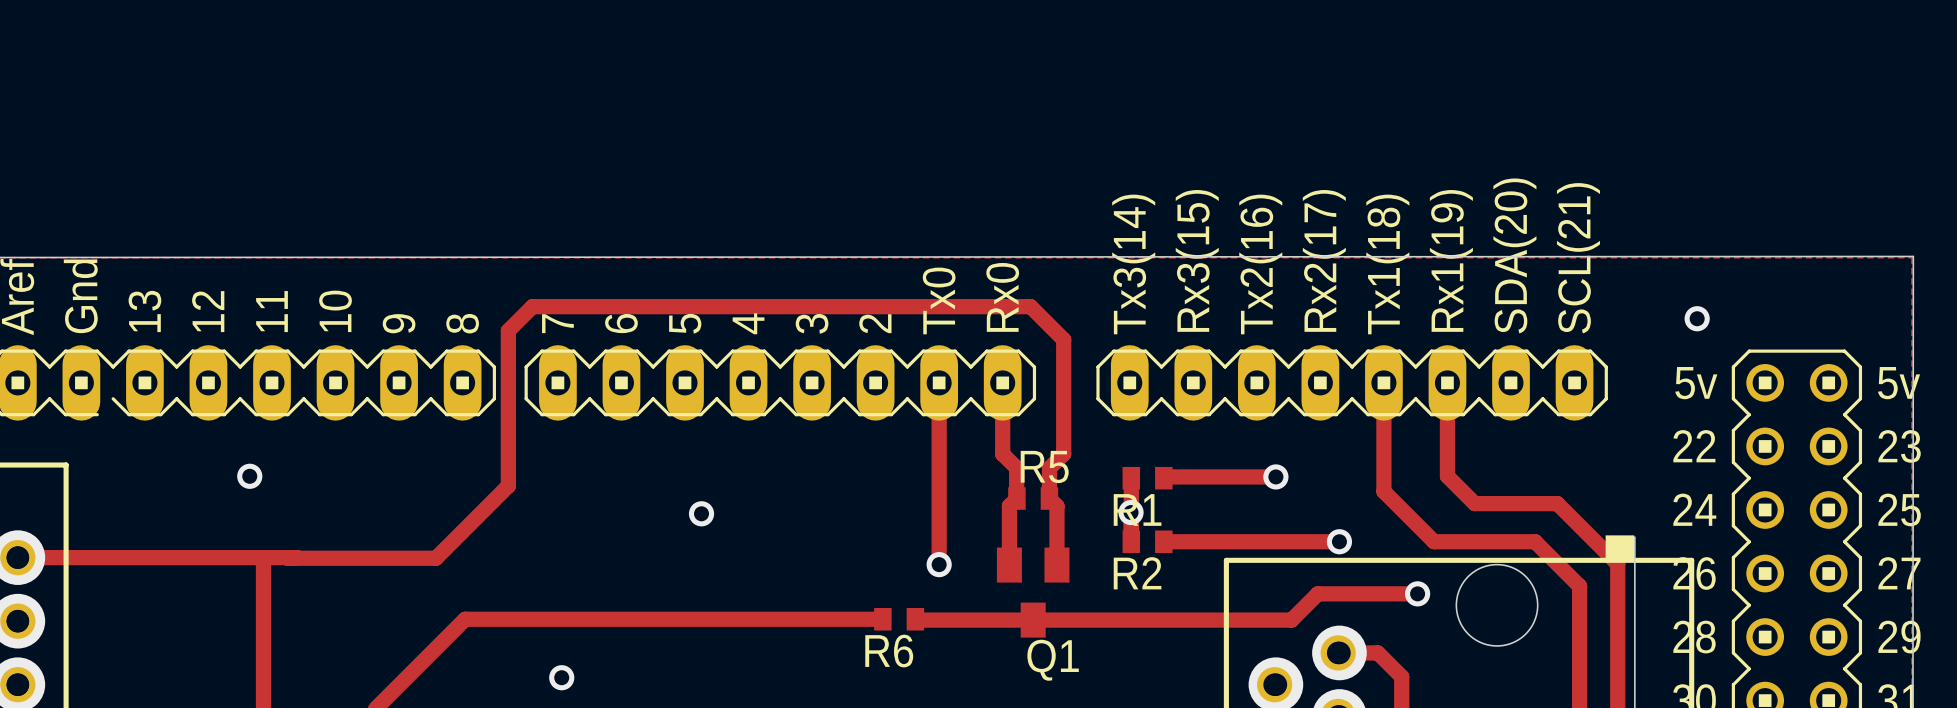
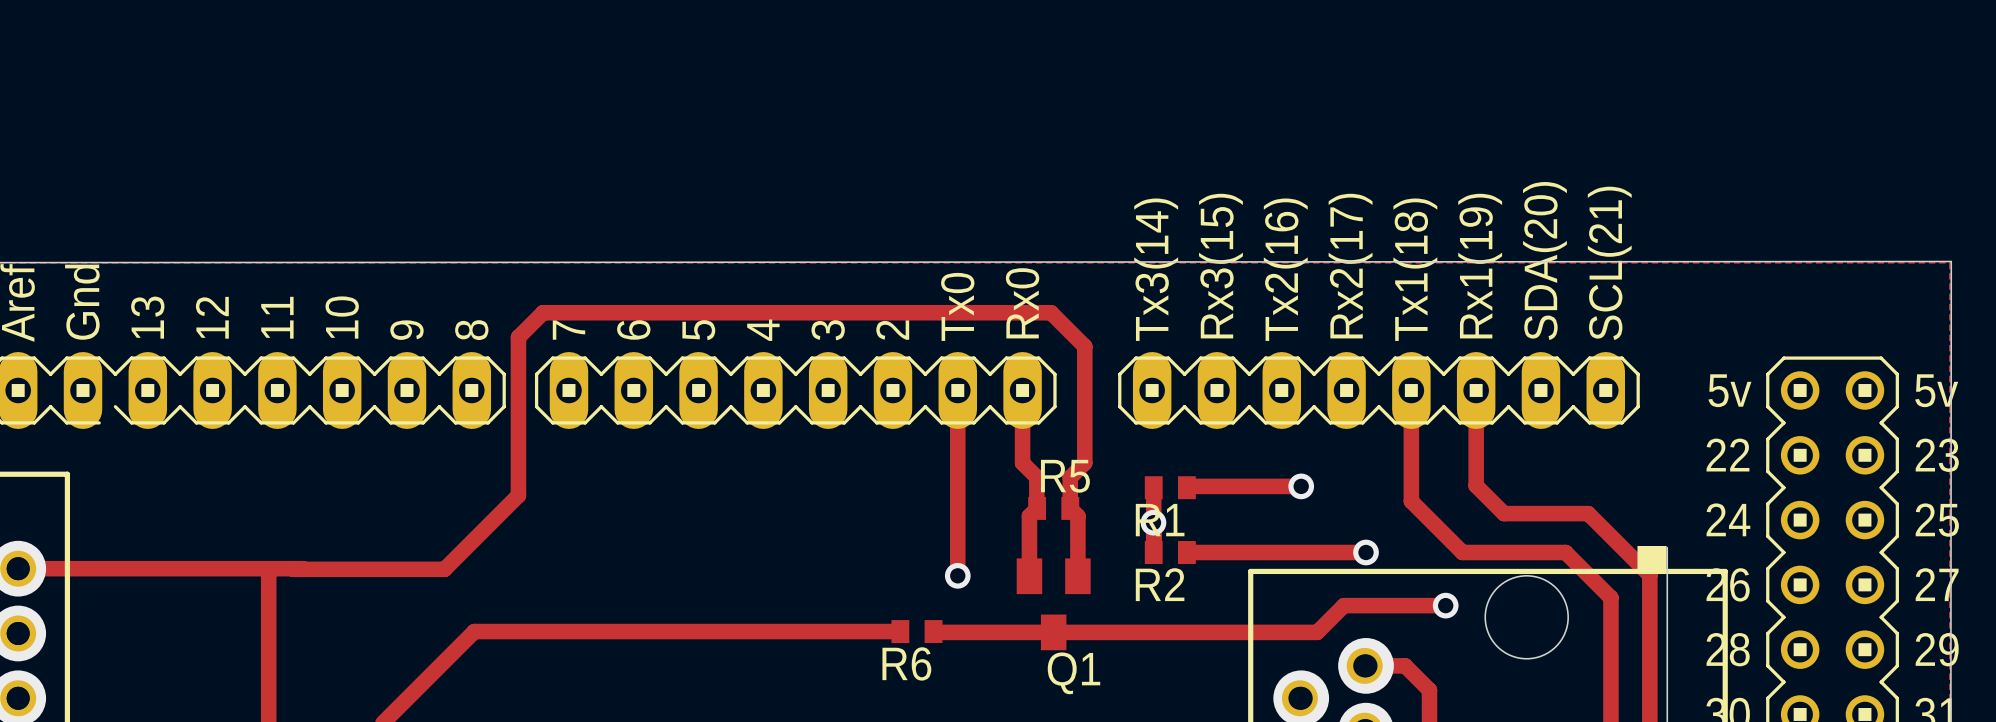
via: (1697, 318) -> none
via: (249, 476) -> none
via: (701, 513) -> none
via: (561, 677) -> none

